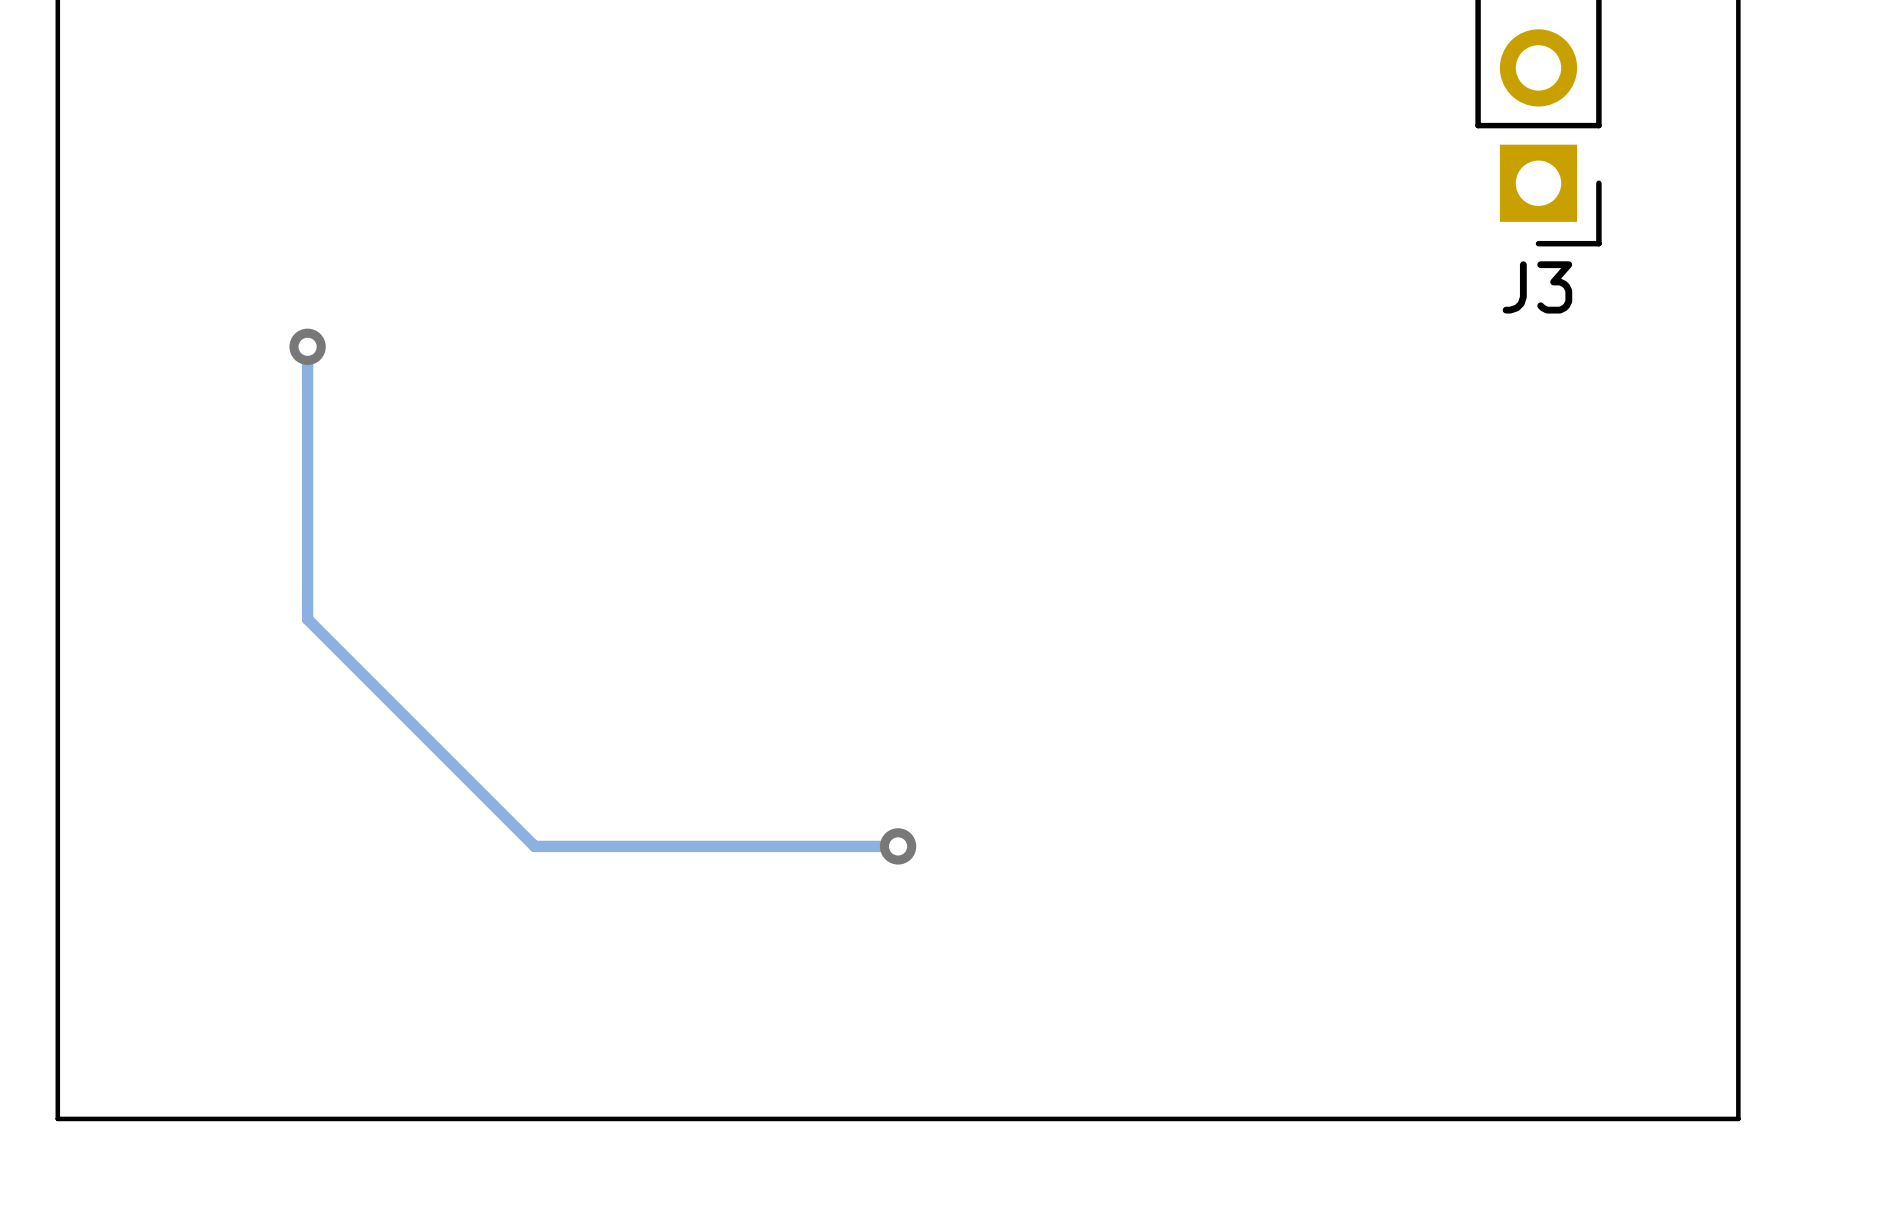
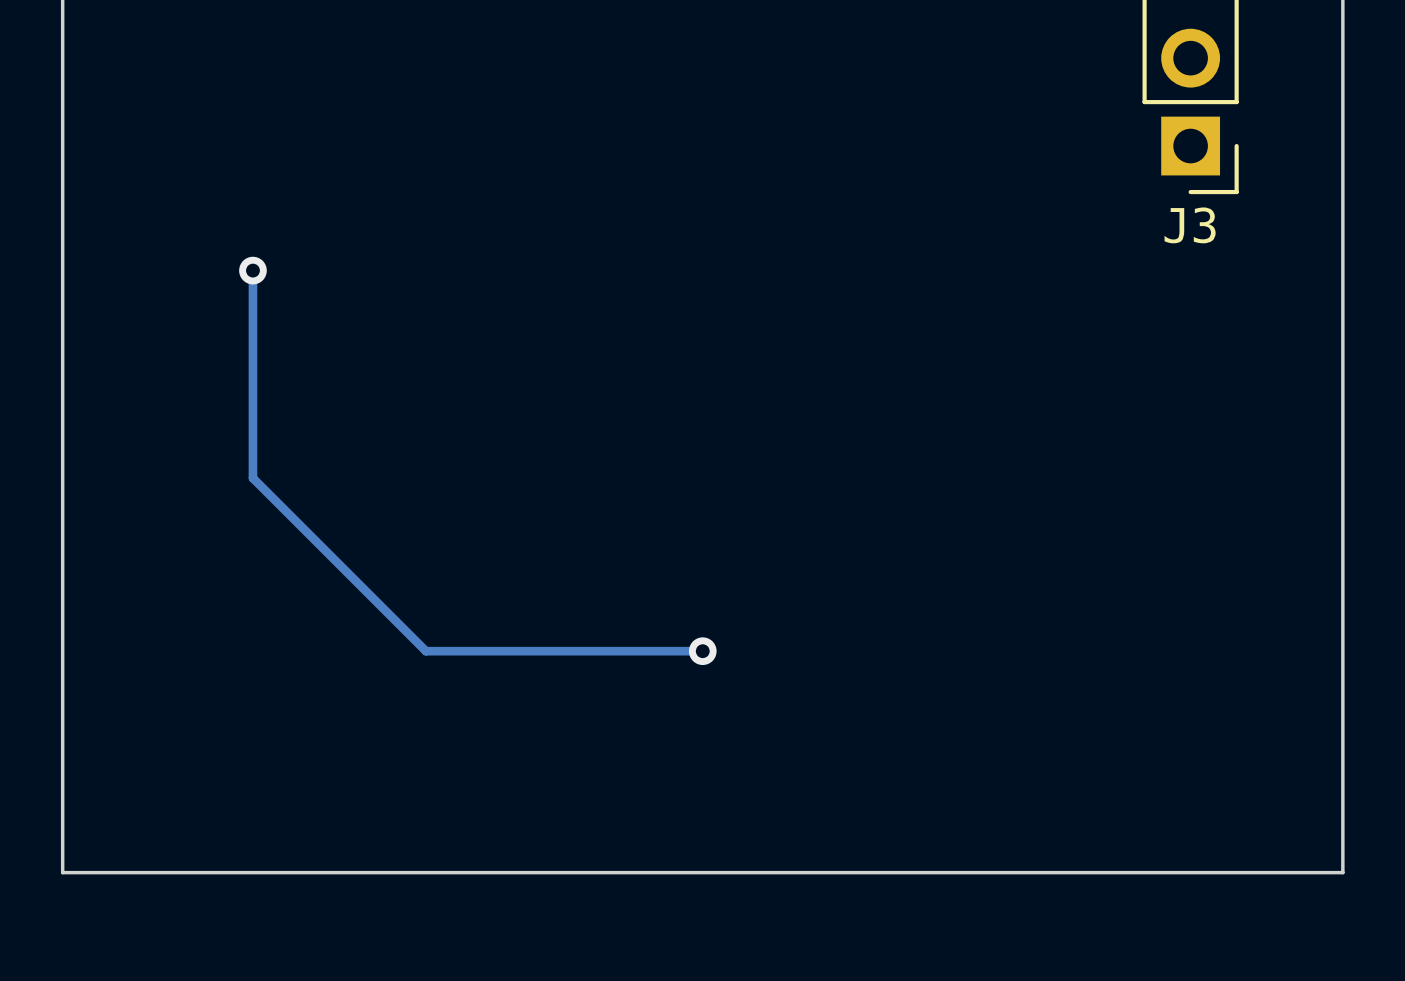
board edge: (1738, 1118) (57, 1118) -> (1342, 858) (1342, 872) (62, 872) (62, 858)

